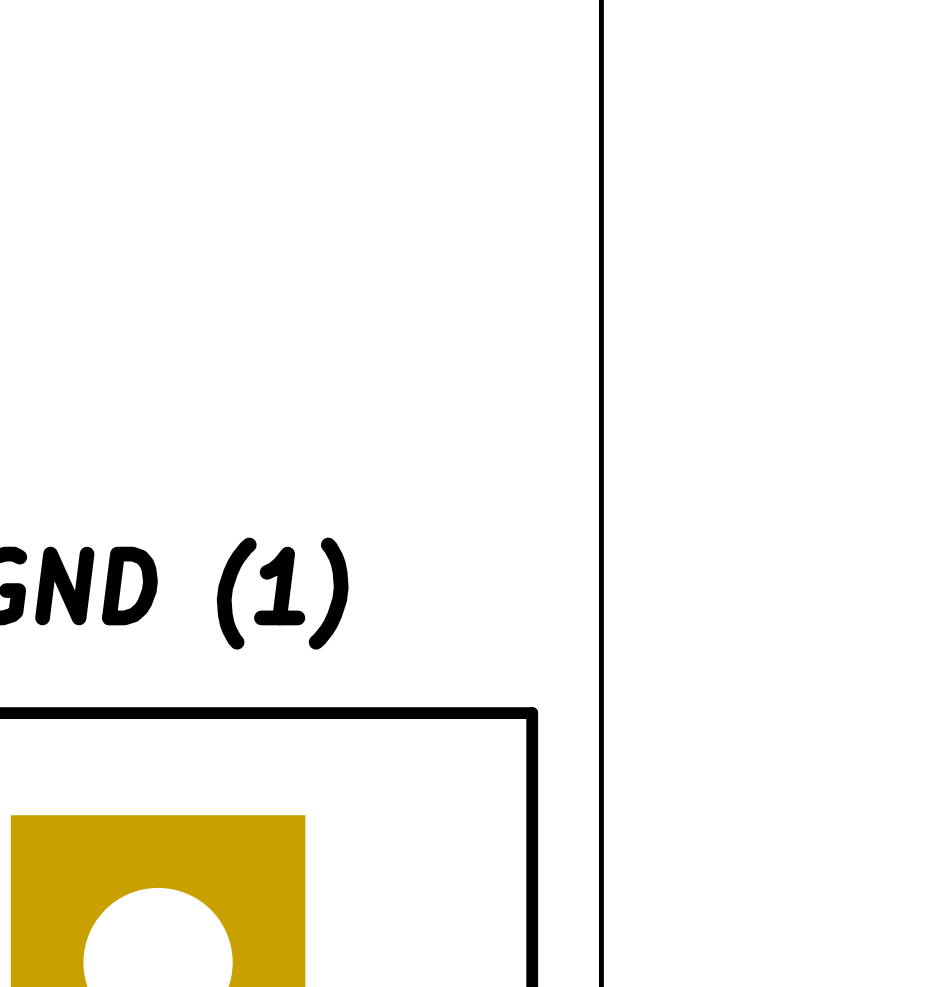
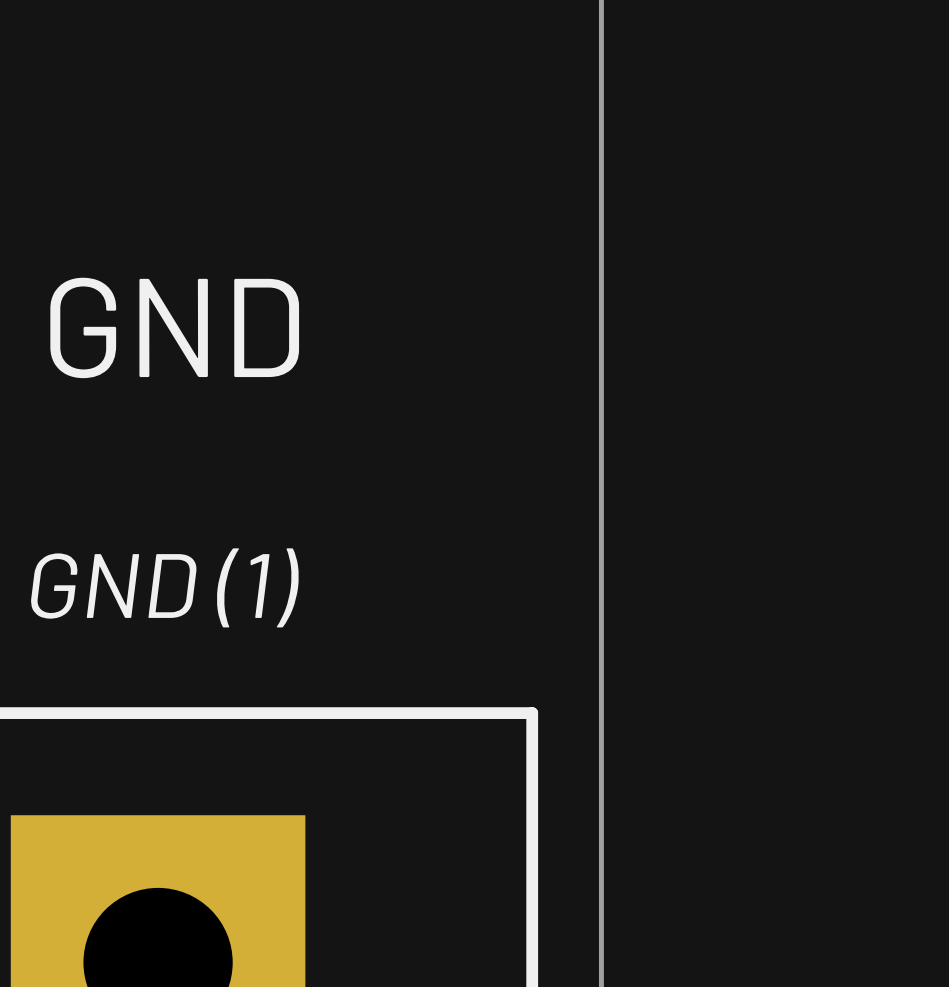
text: none -> GND (174, 327)

